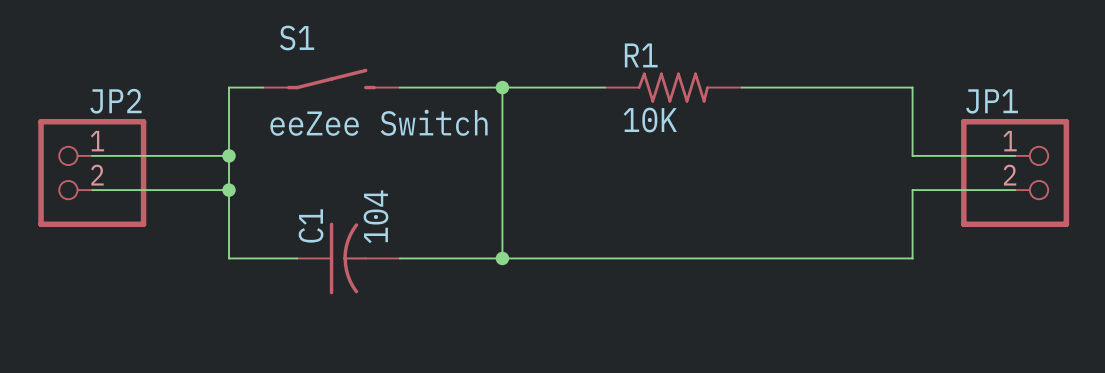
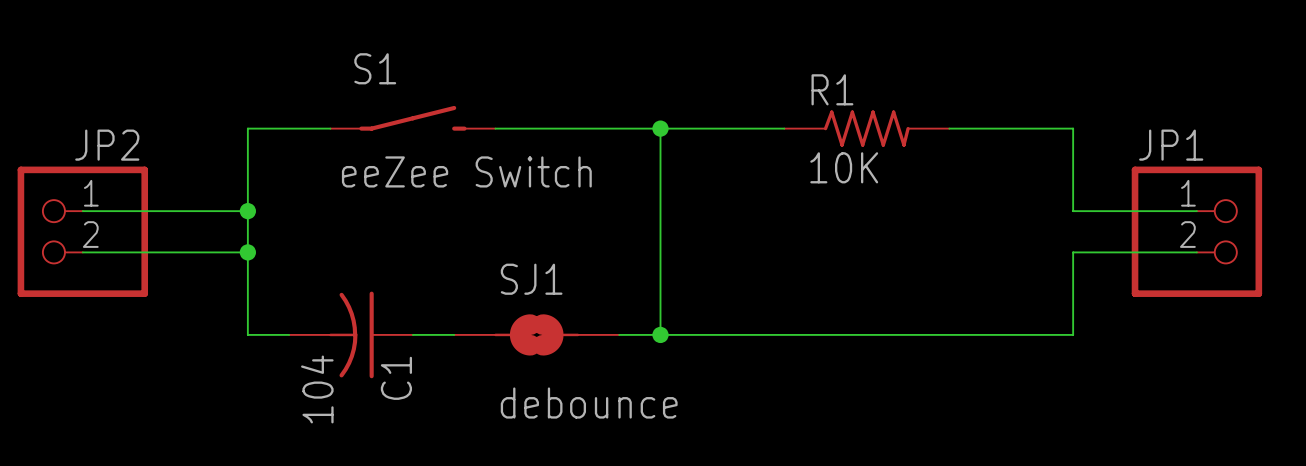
S1 position: (331, 79) -> (412, 118)
wire: (502, 87) (502, 258) -> (660, 128) (660, 334)
junction position: (502, 87) -> (660, 128)
R1 position: (673, 87) -> (866, 128)
C1 rotation: 0° (348, 258) -> 180° (351, 334)
SJ1: none -> debounce (536, 334)
junction position: (502, 258) -> (660, 334)

